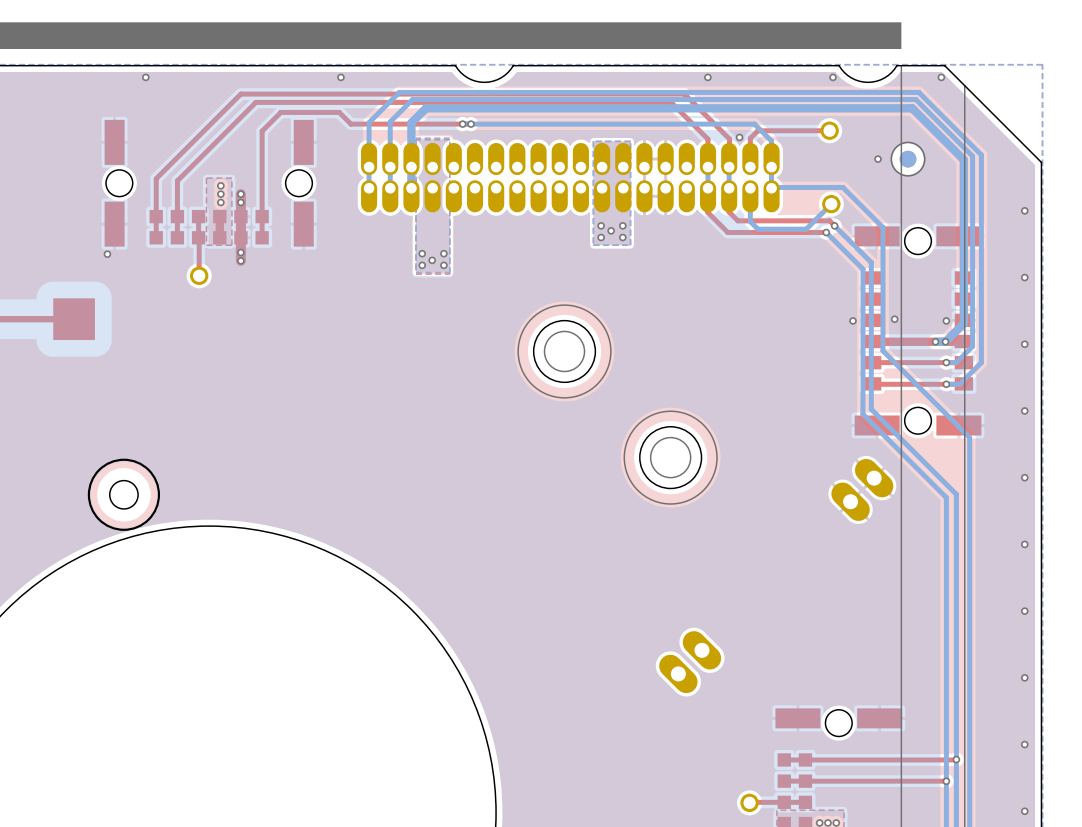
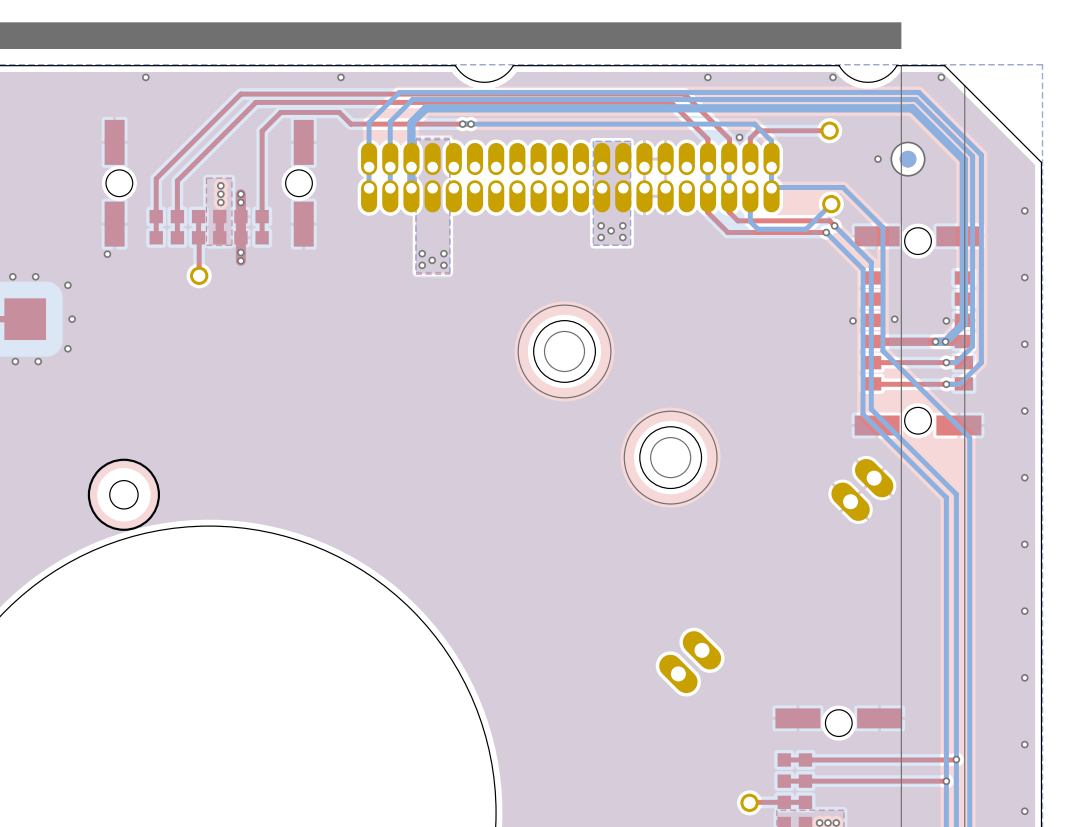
via: none -> (12, 276)
via: none -> (35, 276)
via: none -> (67, 285)
via: none -> (72, 319)
top track: (74, 319) (25, 319) -> none
part position: (74, 319) -> (25, 319)
via: none -> (67, 348)
via: none -> (15, 361)
via: none -> (38, 361)

